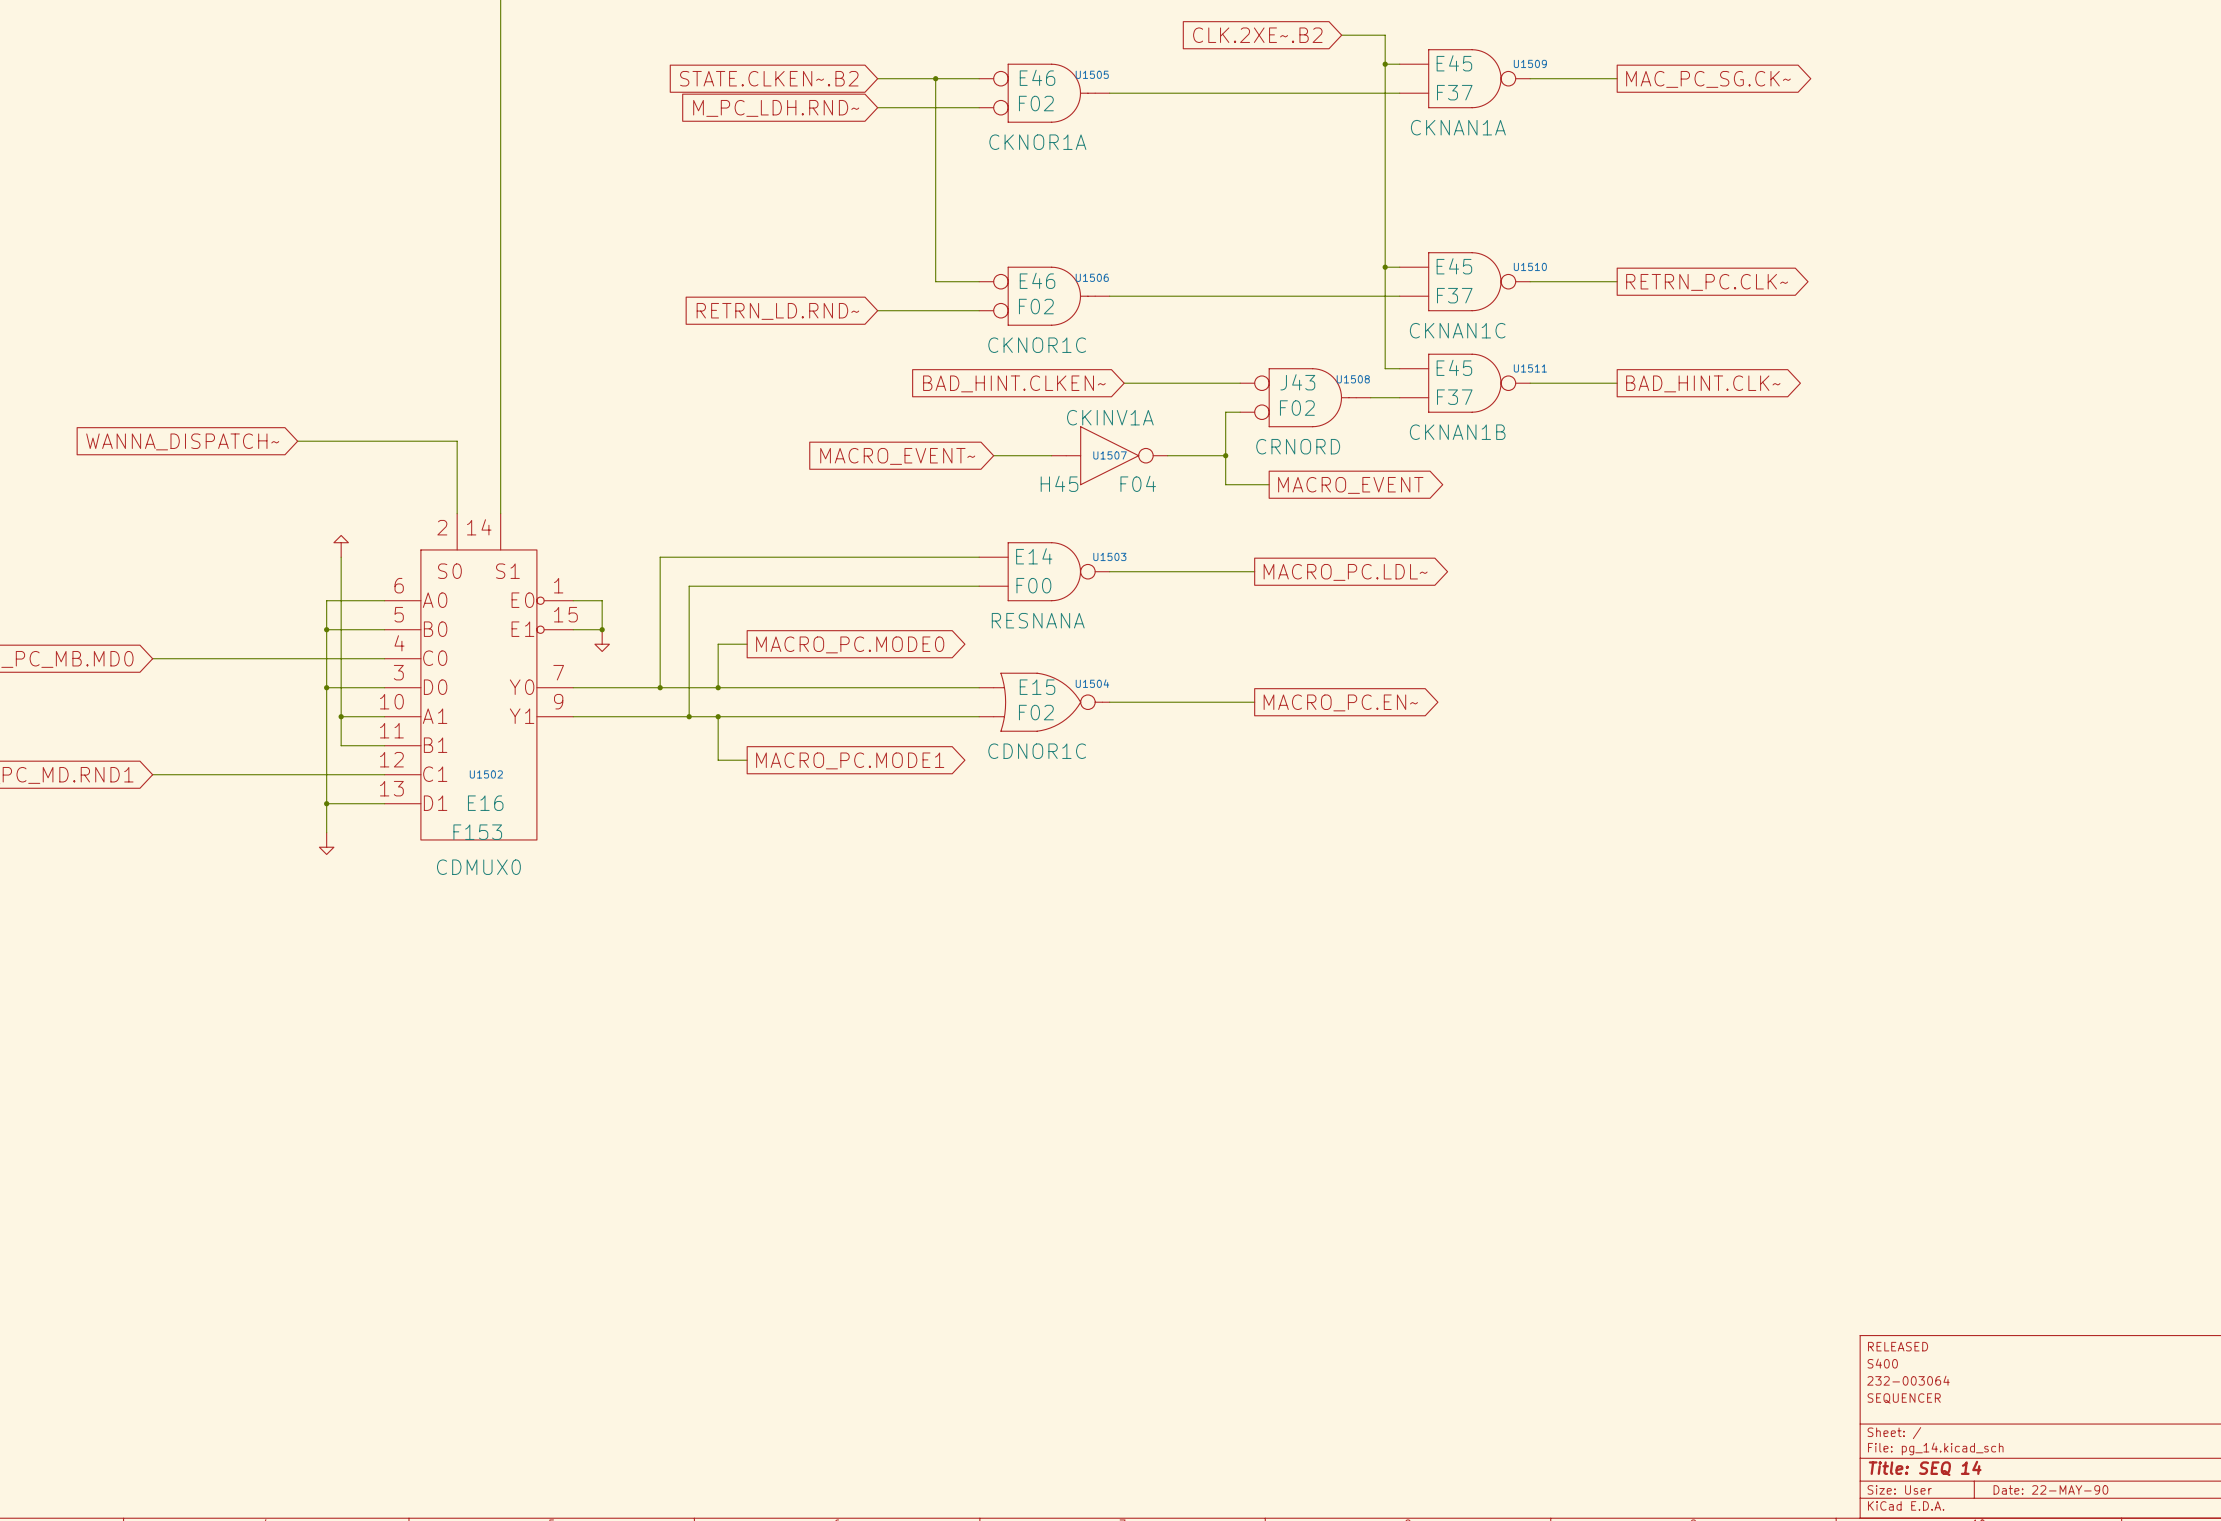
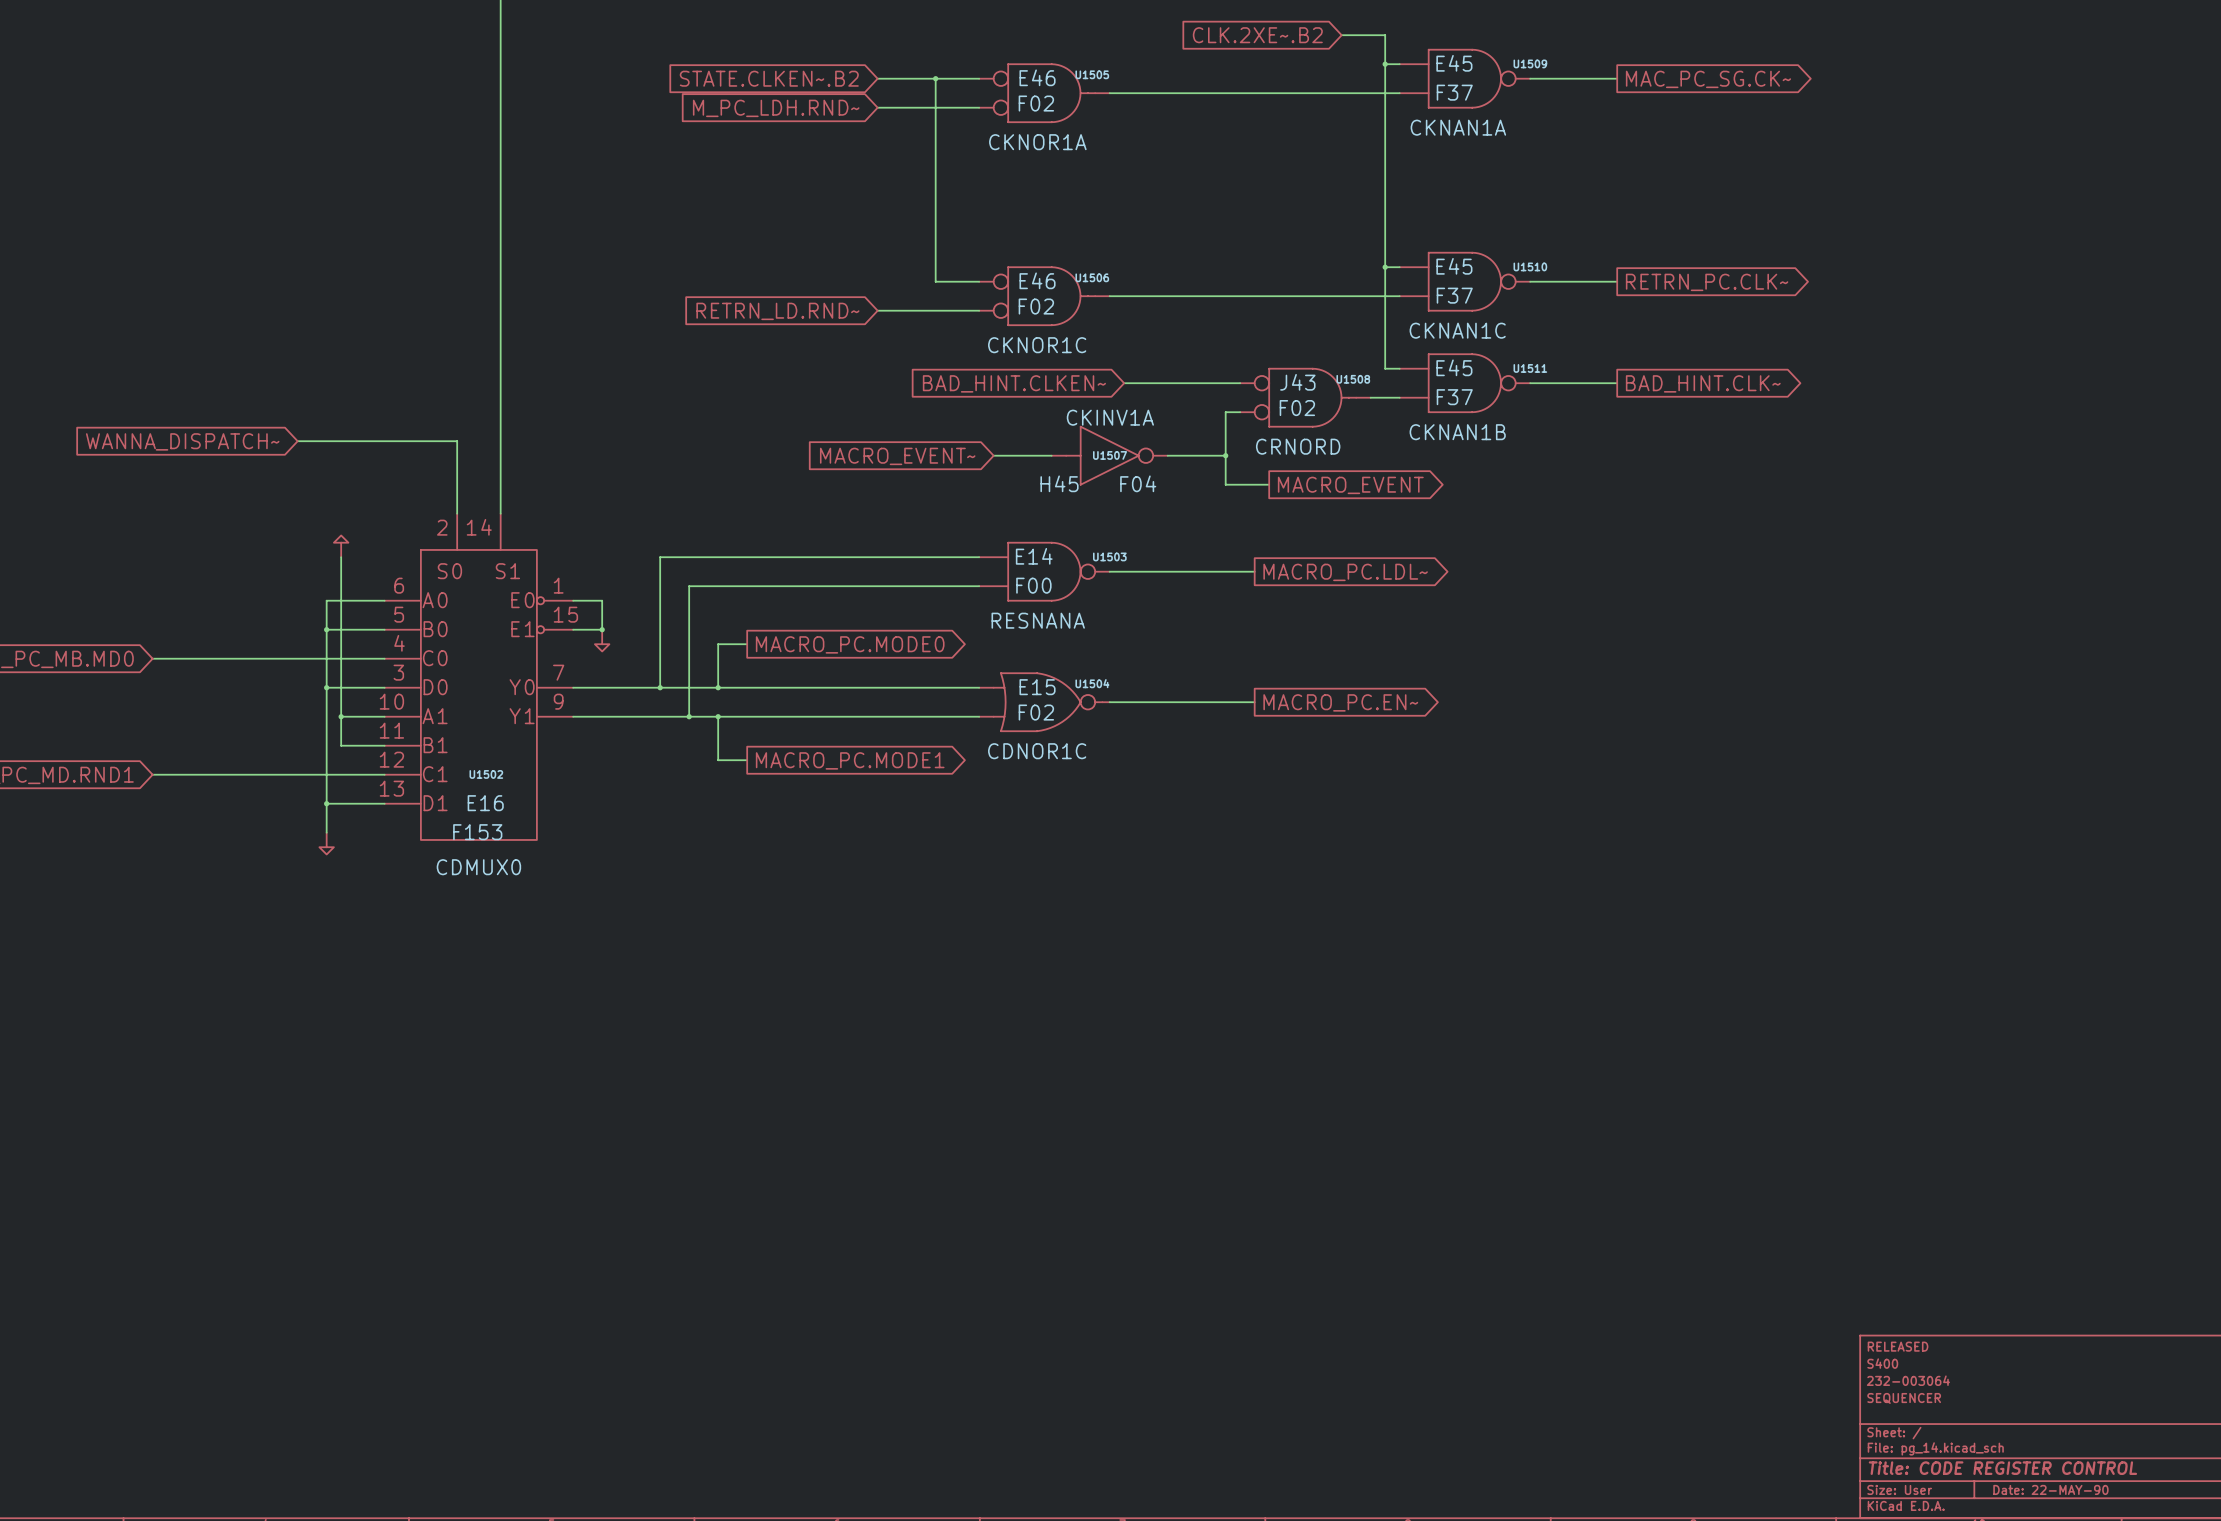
title block: Title: SEQ 14 (1925, 1468) -> Title: CODE REGISTER CONTROL (2002, 1468)

